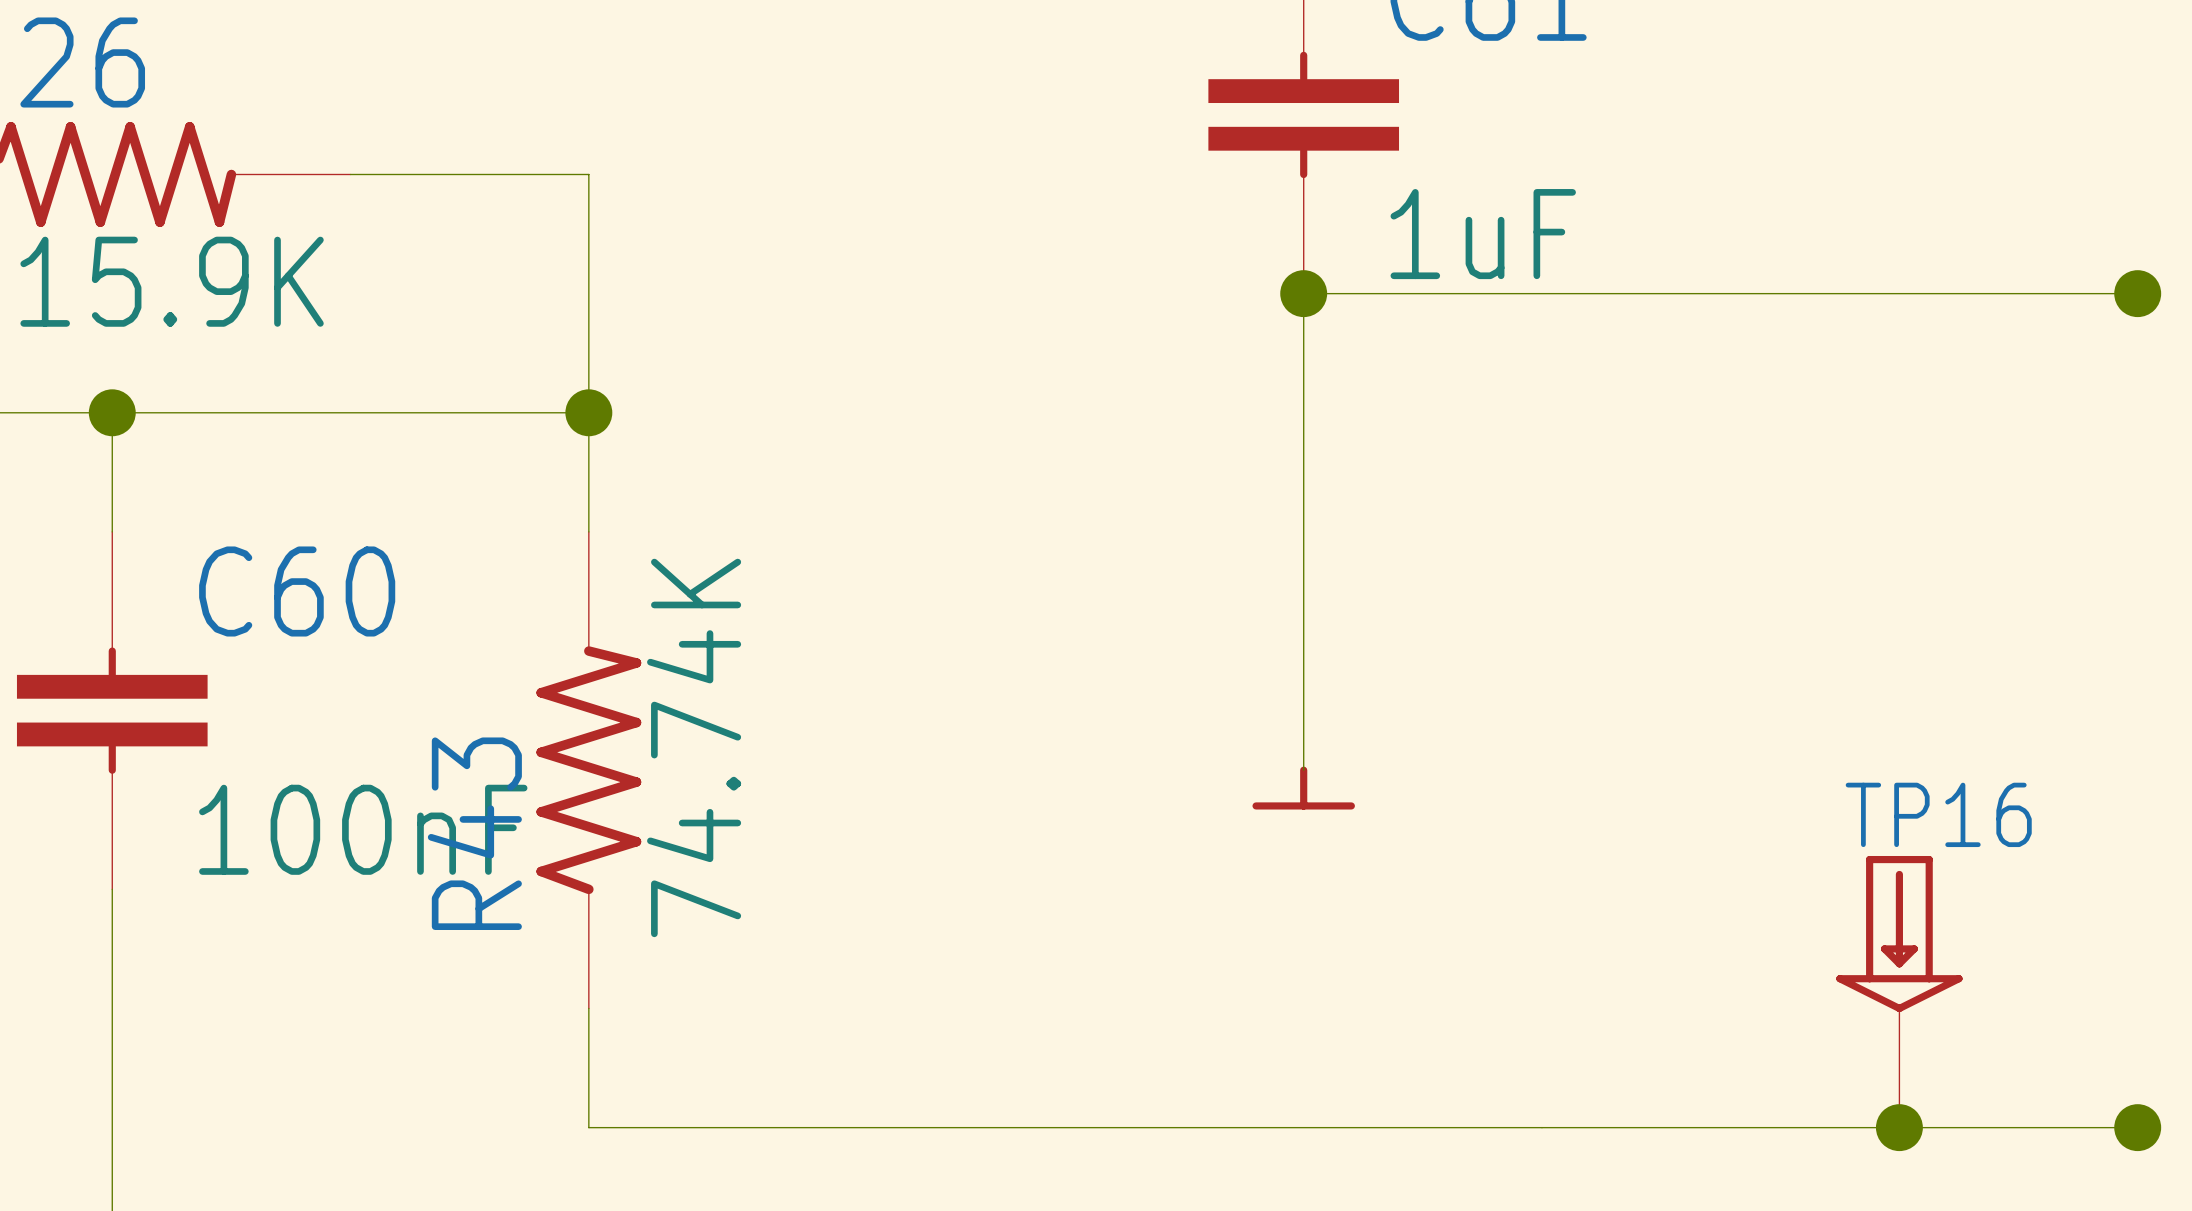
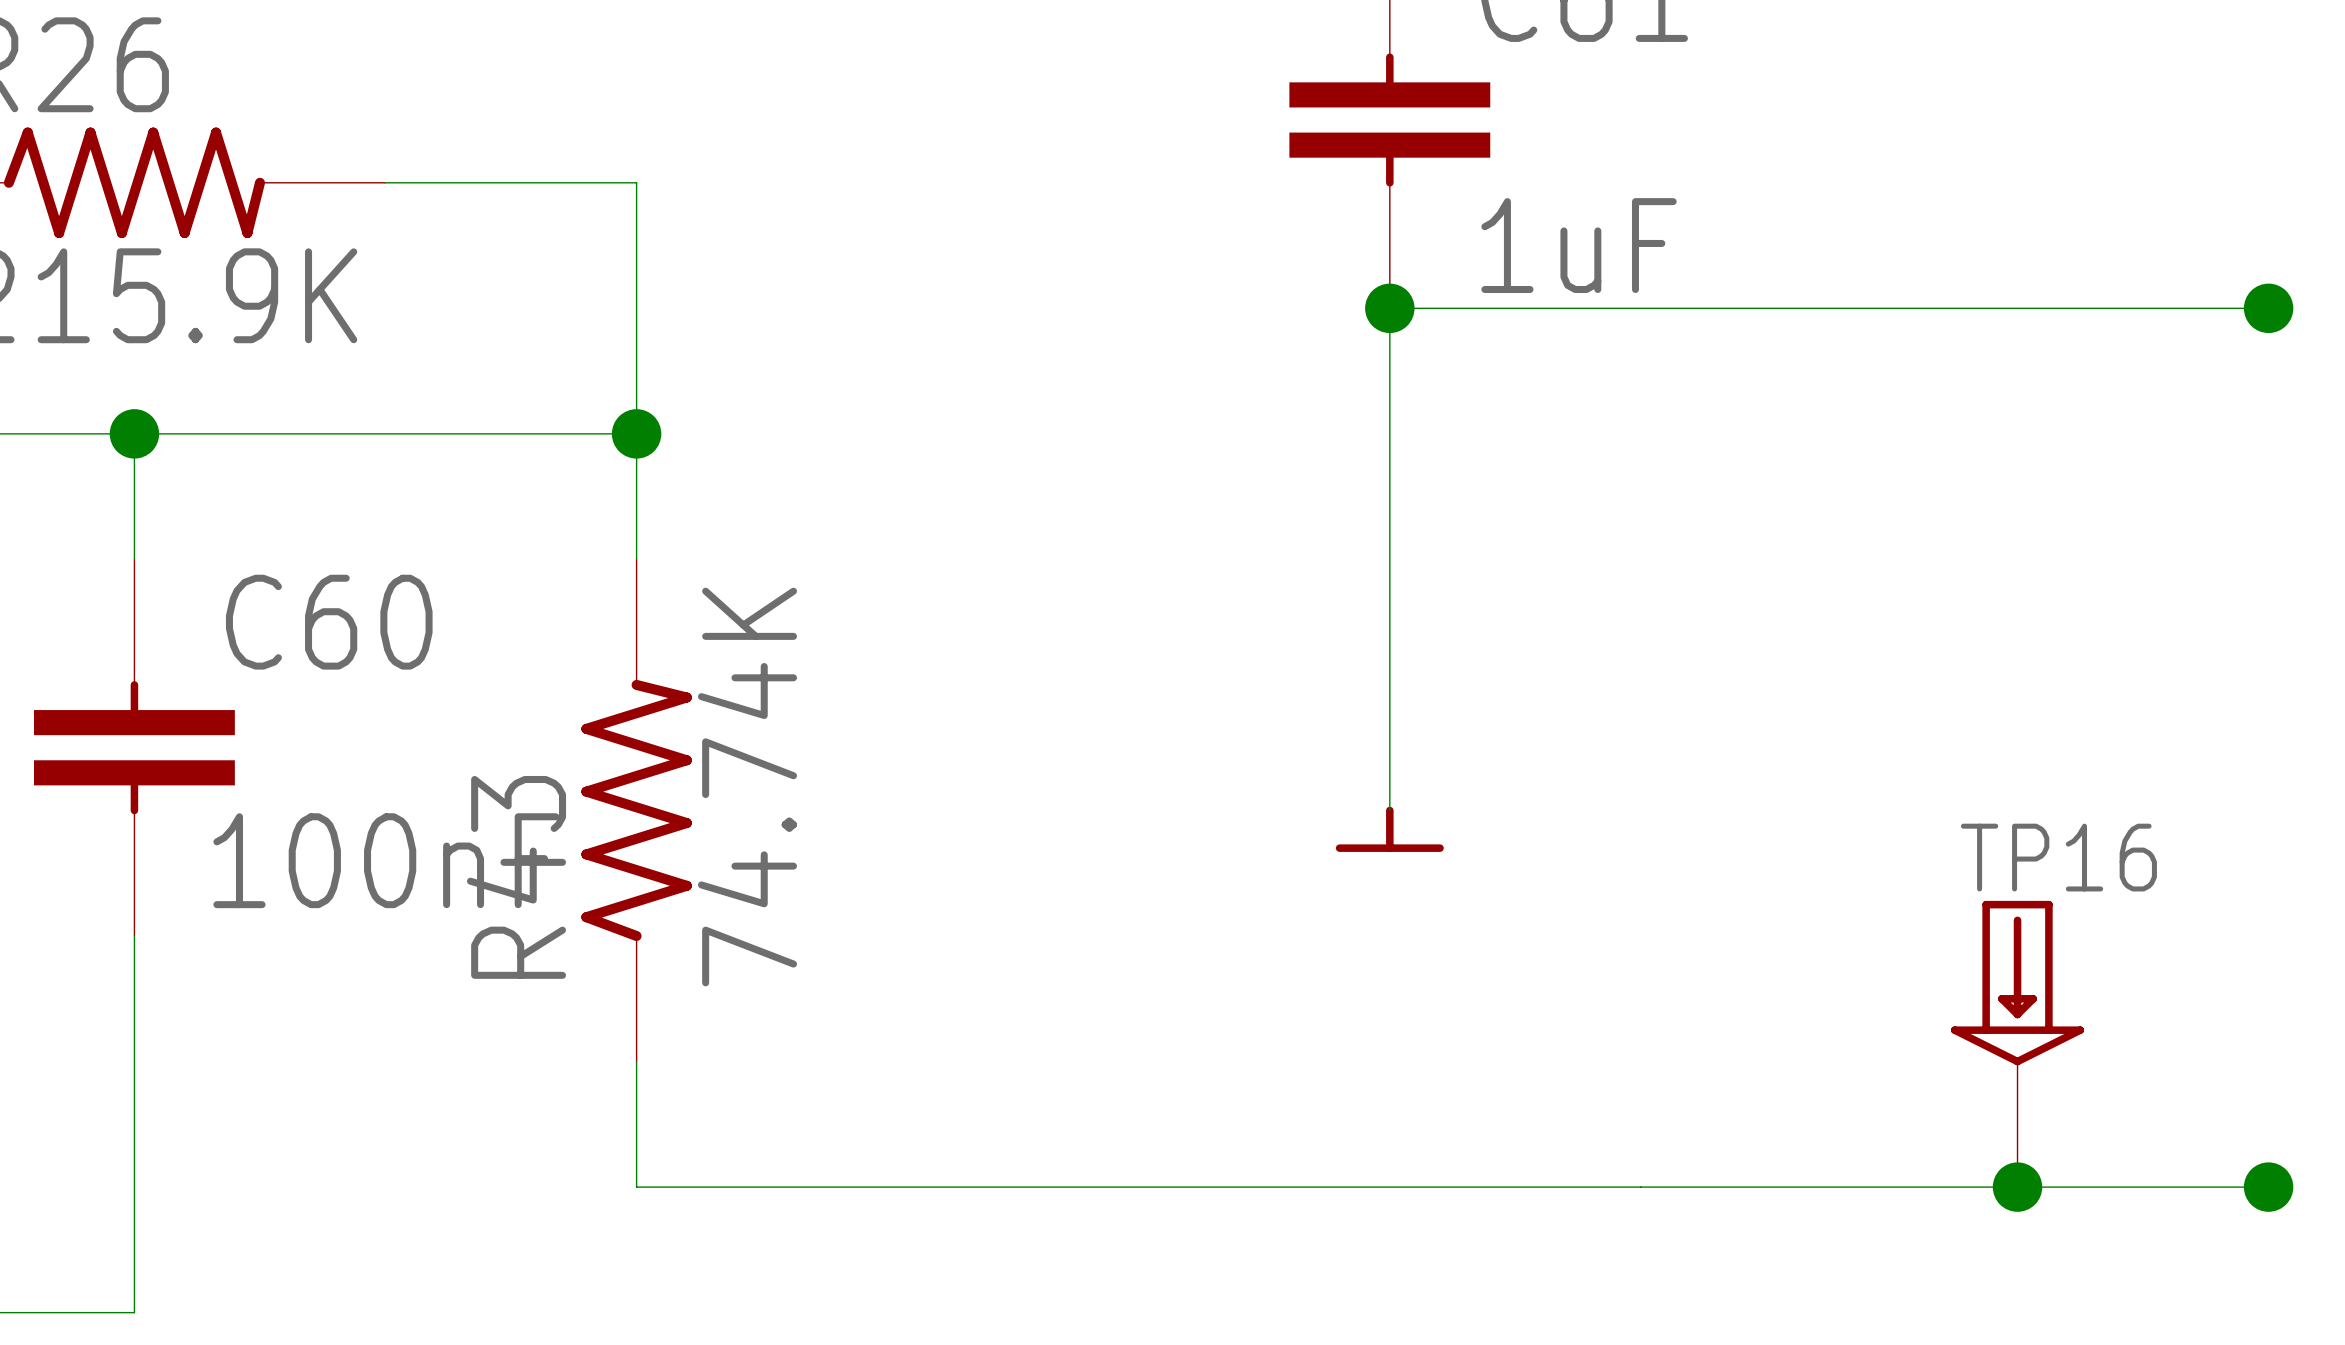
C60 value position: 100nF (363, 829) -> 100nF (386, 860)

